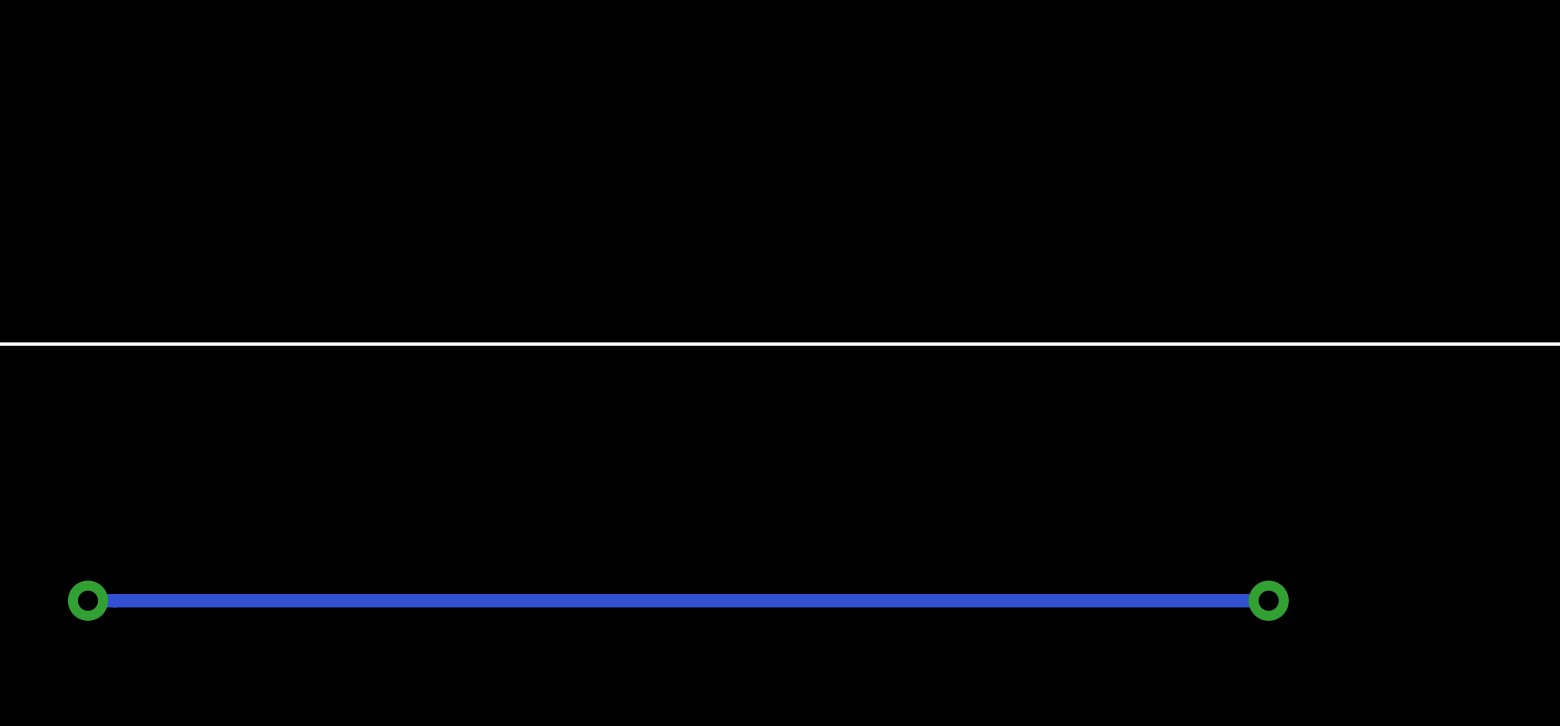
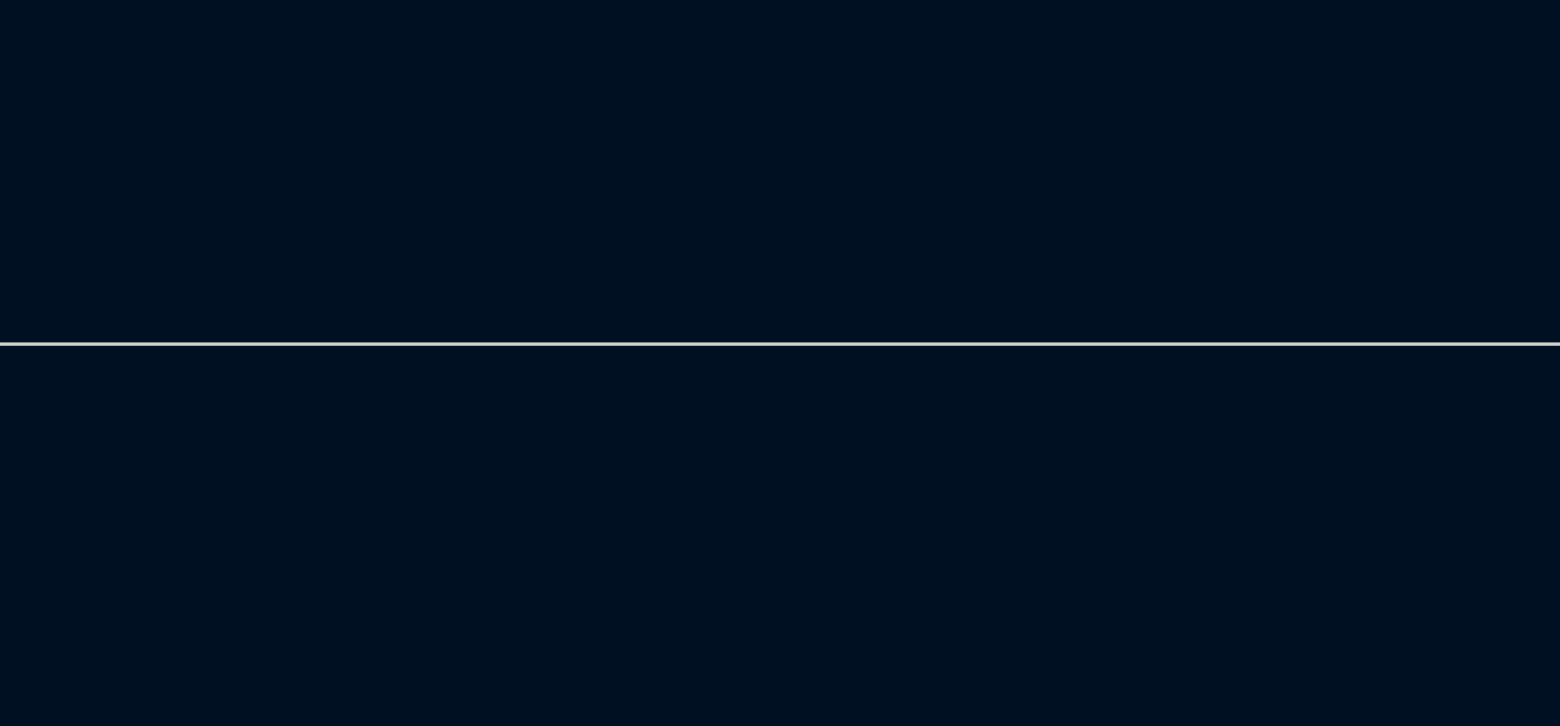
via: (87, 600) -> none
track: (1268, 600) (87, 600) -> none
via: (1268, 600) -> none

